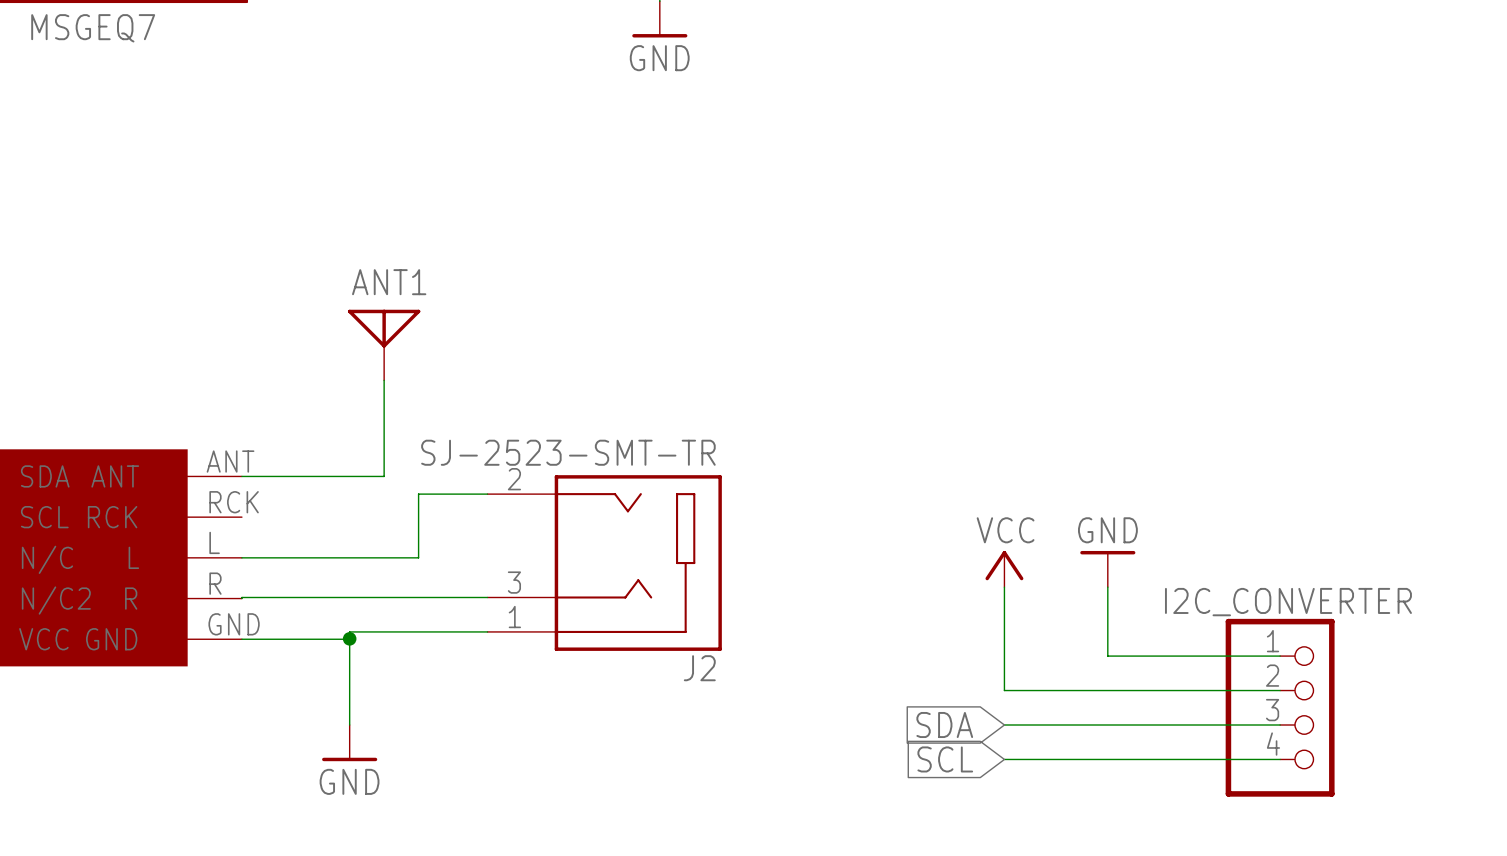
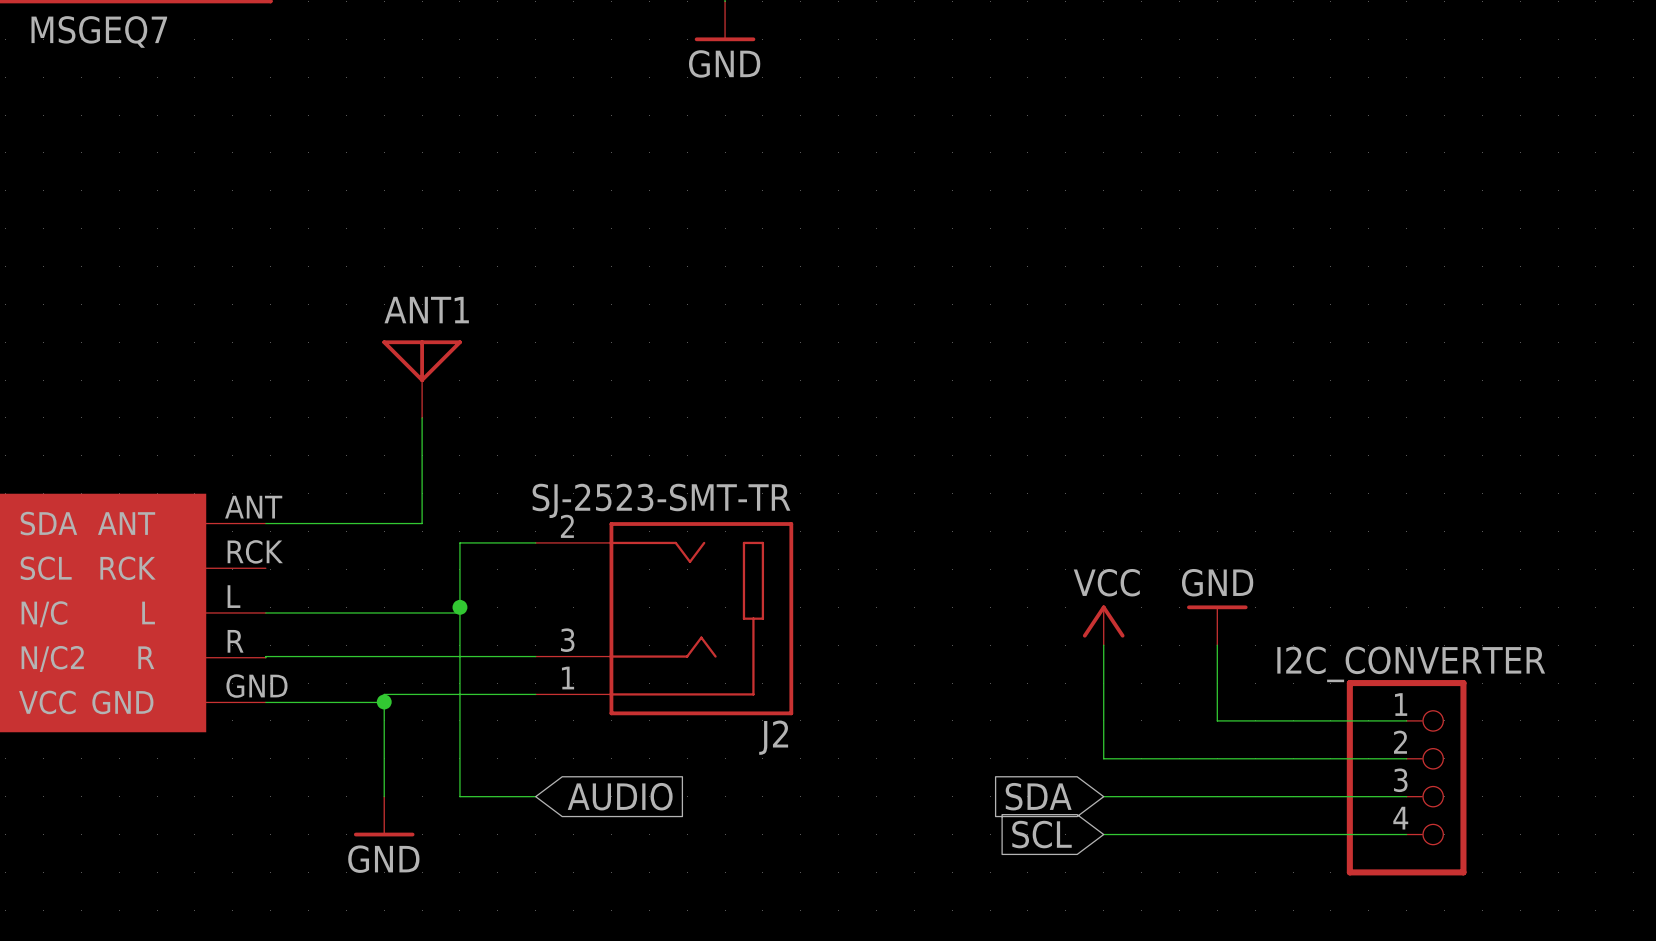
junction: none -> (459, 607)
wire: none -> (459, 612) (459, 796) (535, 796)
global label: none -> AUDIO (620, 796)

